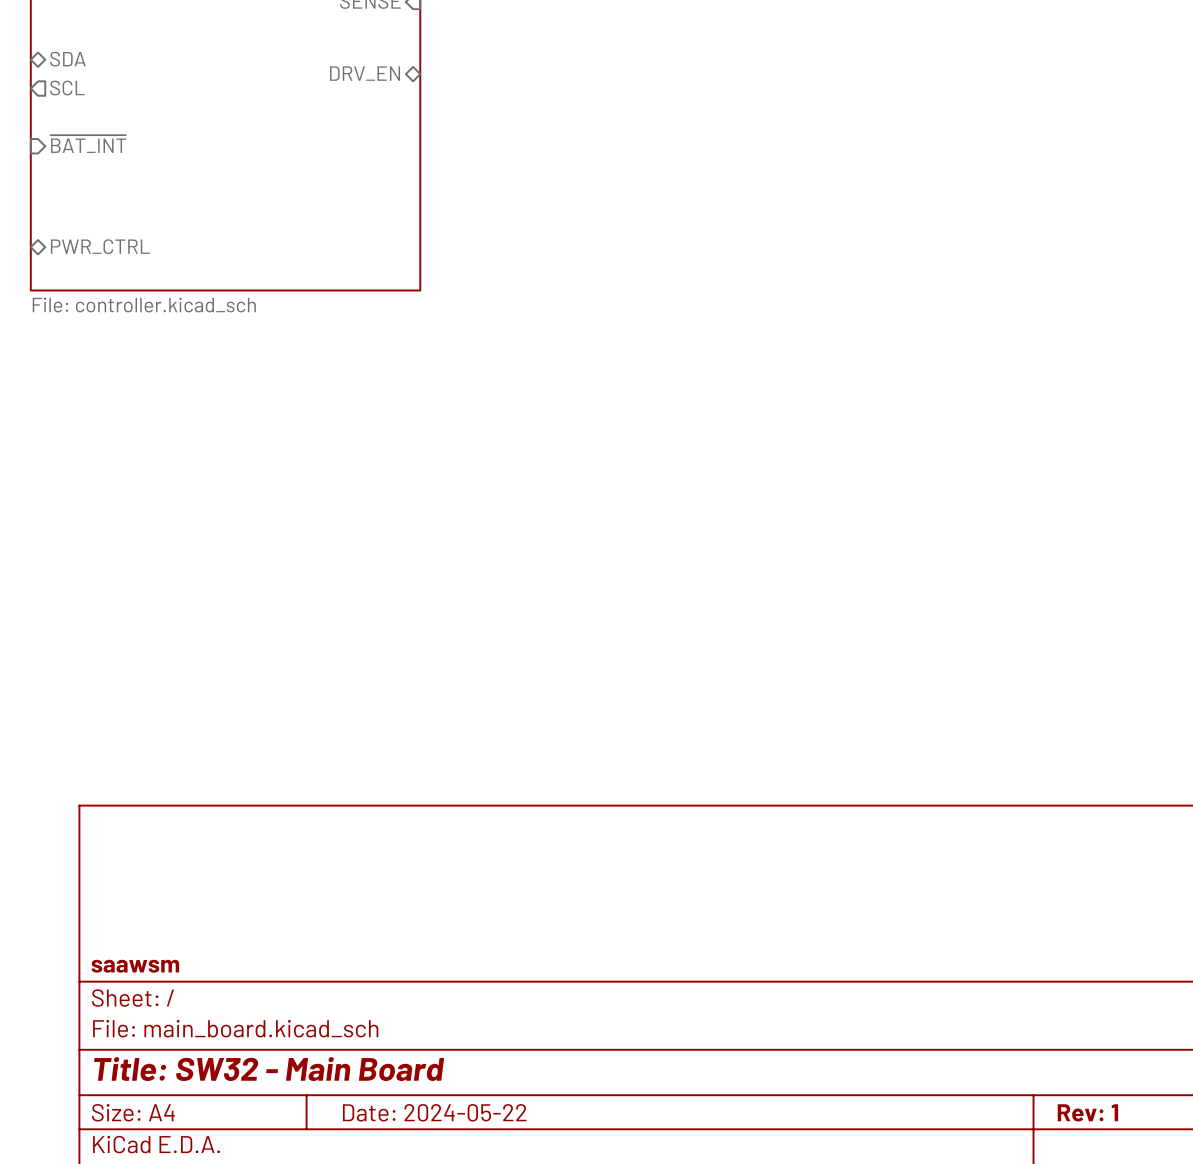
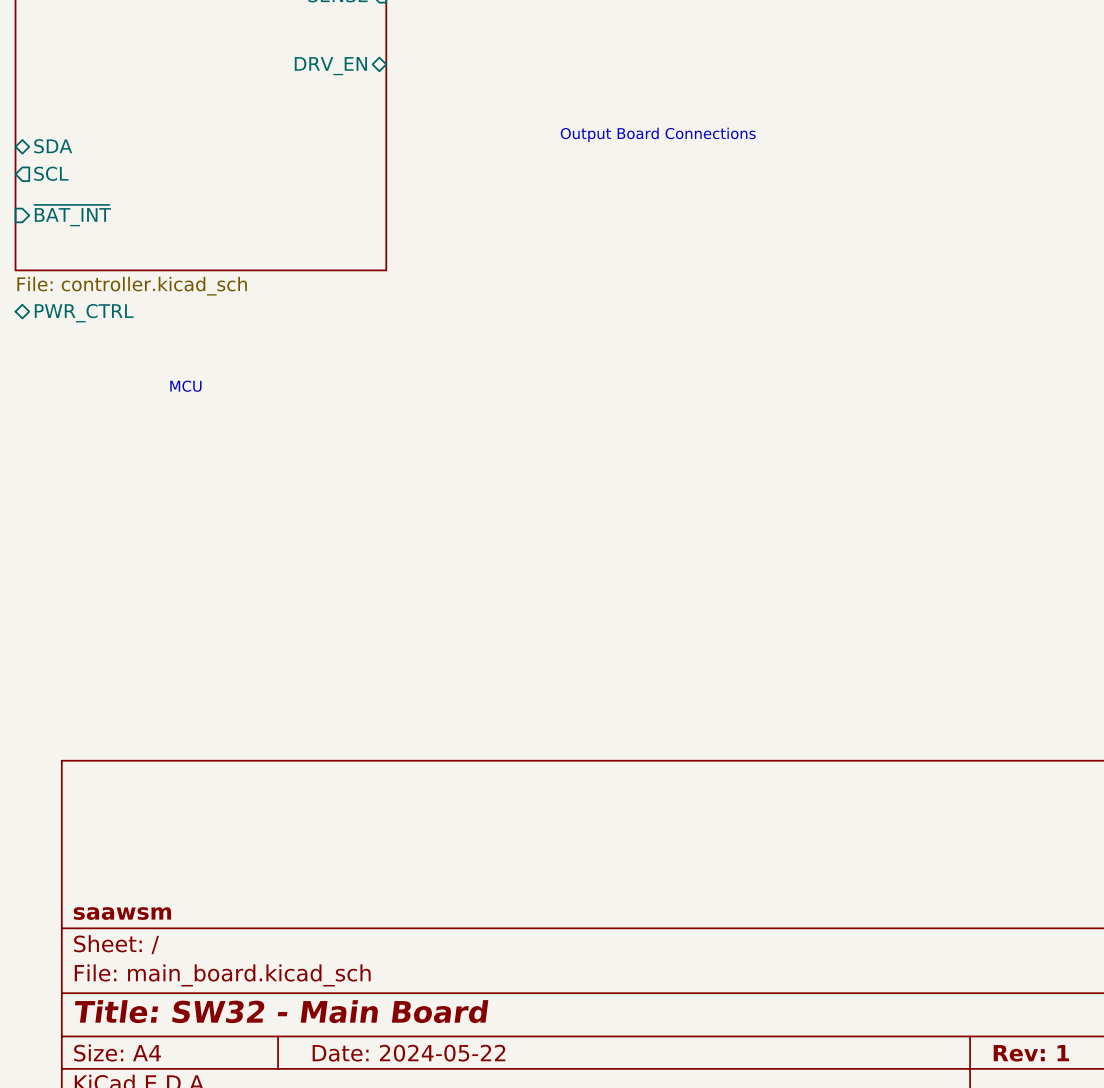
sheet pin position: SDA (67, 59) -> SDA (53, 146)
sheet pin position: SCL (67, 88) -> SCL (51, 173)
sheet pin position: ~{BAT_INT} (88, 144) -> ~{BAT_INT} (72, 215)
text: none -> Output Board Connections (658, 134)
sheet pin position: PWR_CTRL (100, 246) -> PWR_CTRL (84, 313)
text: none -> MCU (185, 386)

